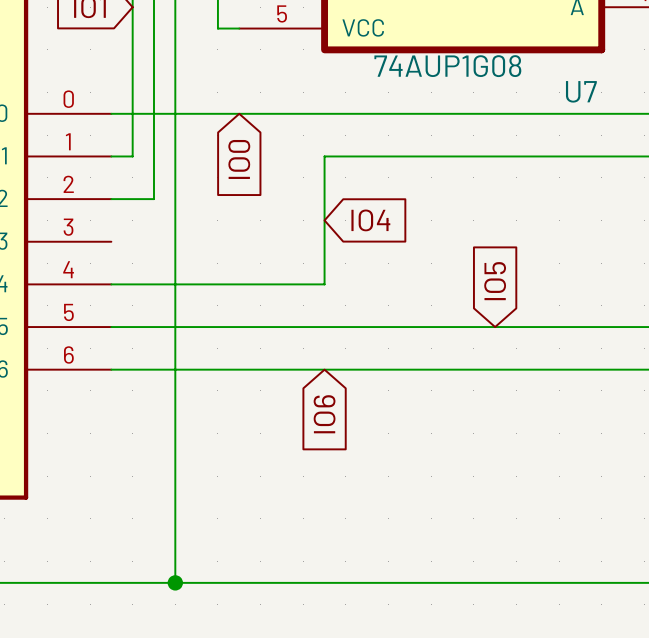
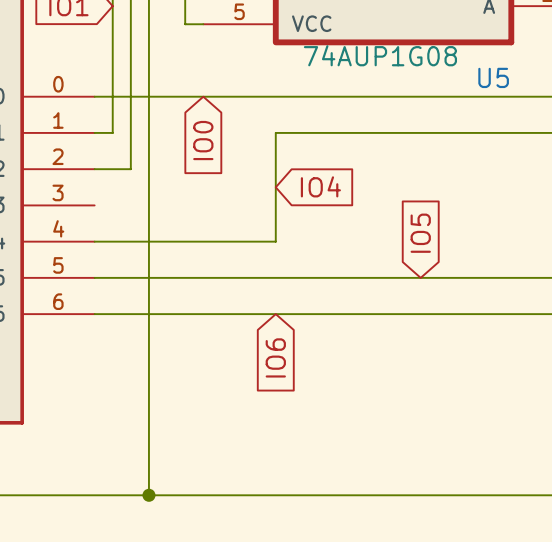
U7 name: U7 (581, 91) -> U5 (493, 77)

